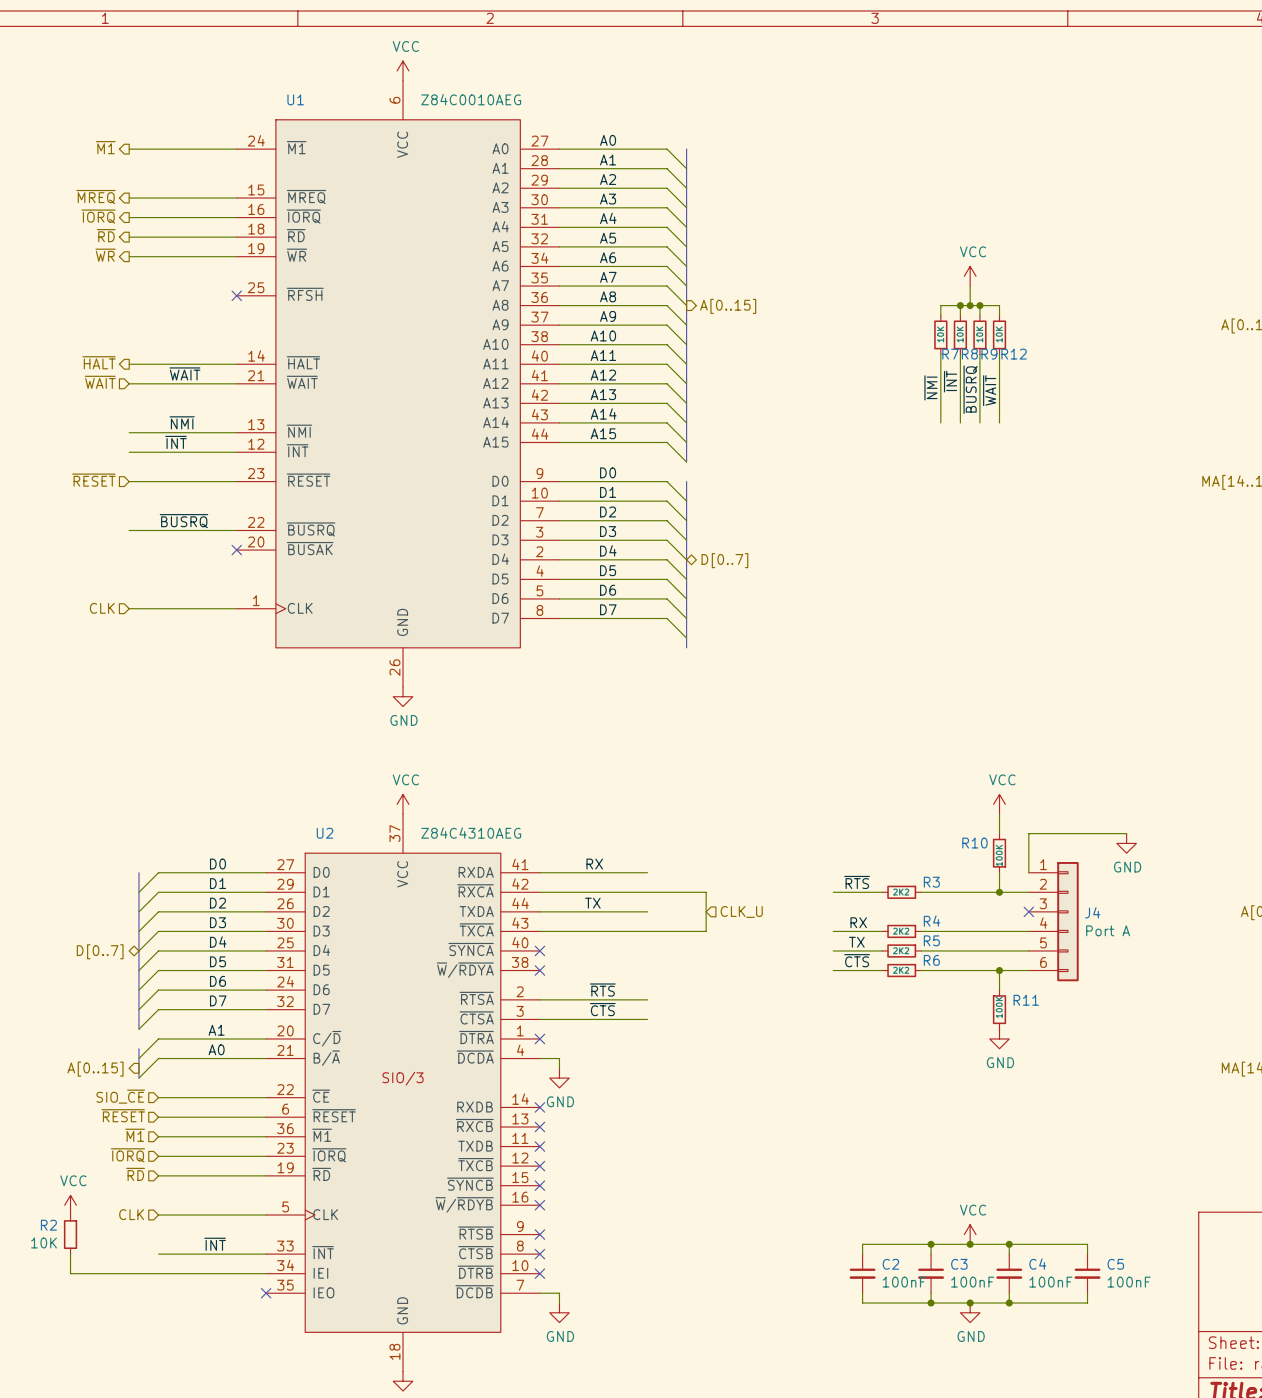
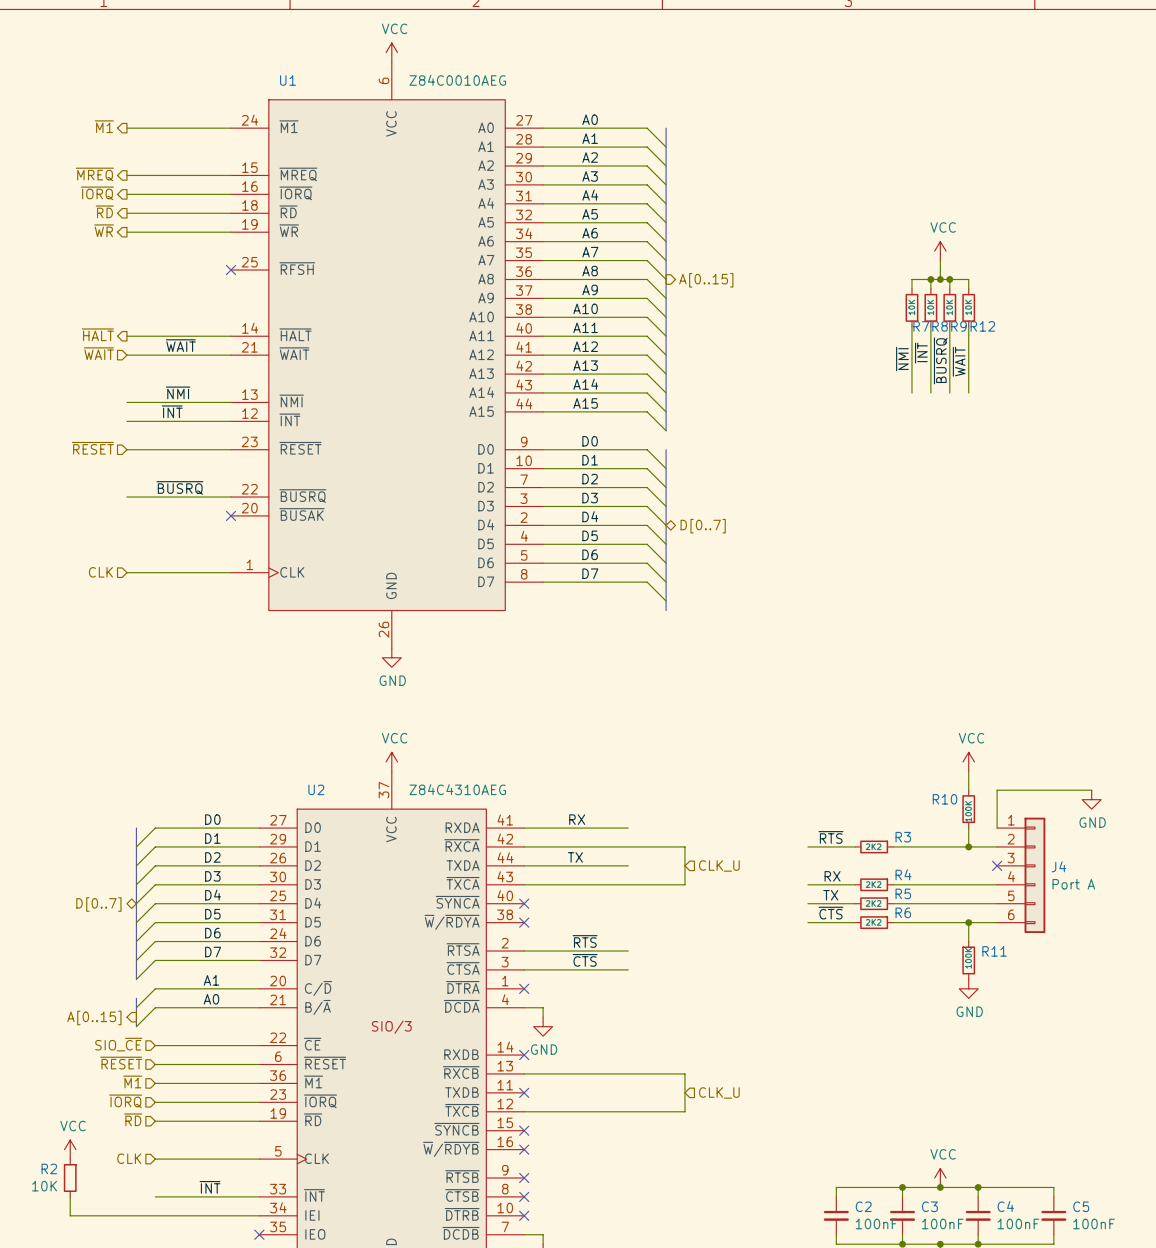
wire: none -> (524, 1073) (684, 1073) (684, 1111) (524, 1111)
no-connect mark: (539, 1126) -> none
hierarchical label: none -> CLK_U (719, 1092)
no-connect mark: (539, 1166) -> none

